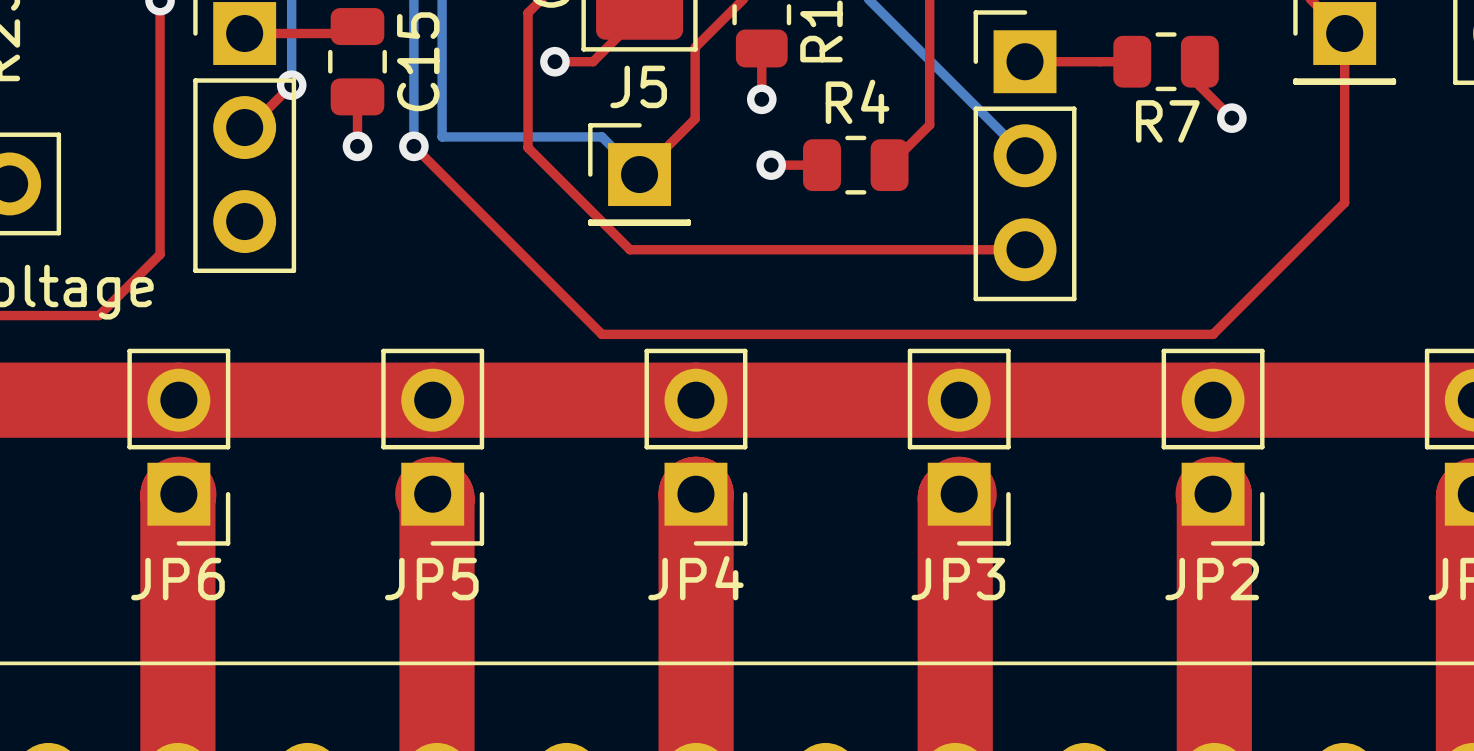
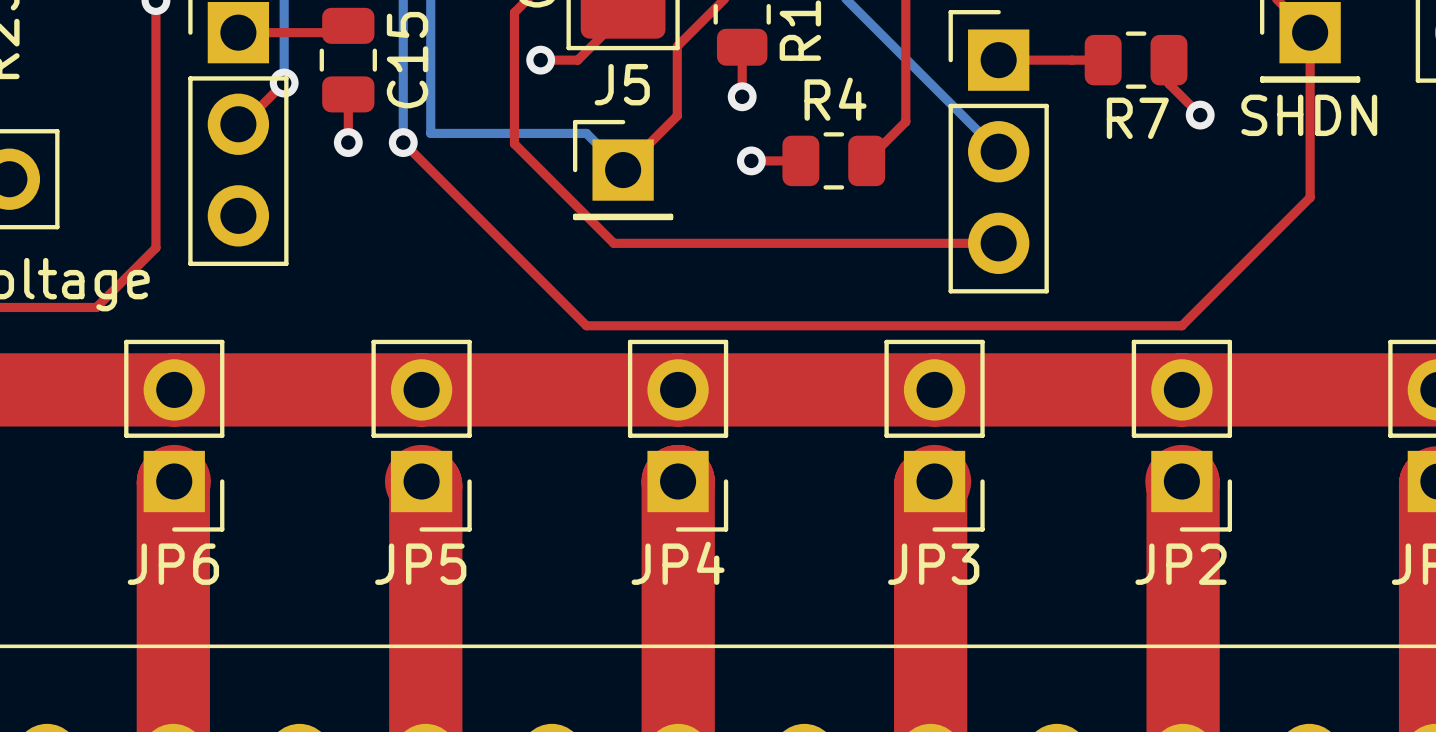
part value: none -> SHDN (1309, 115)

